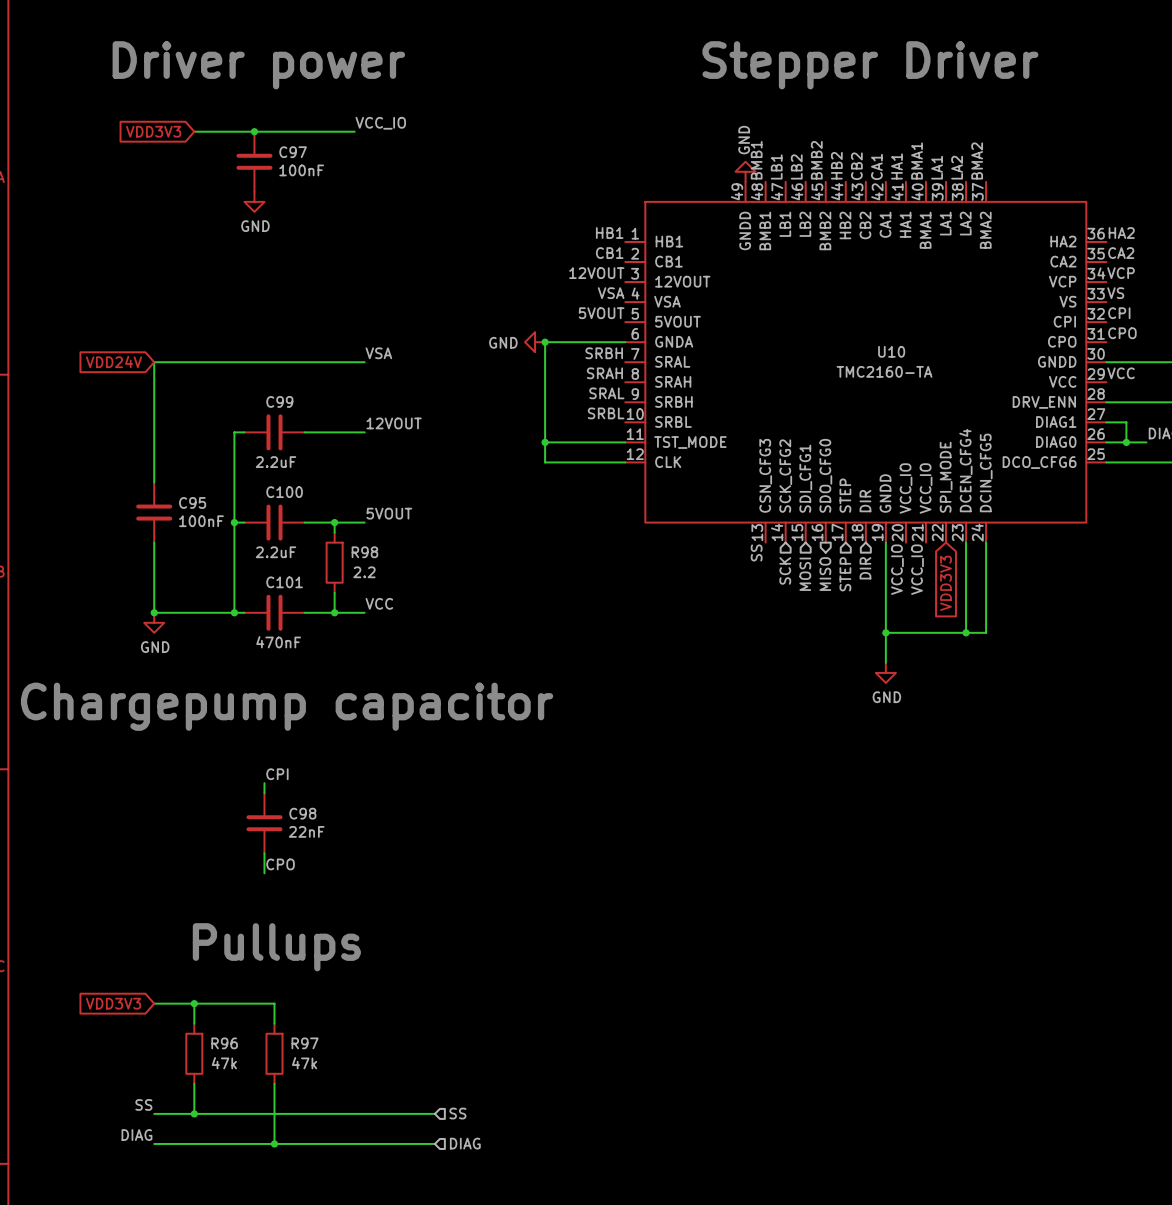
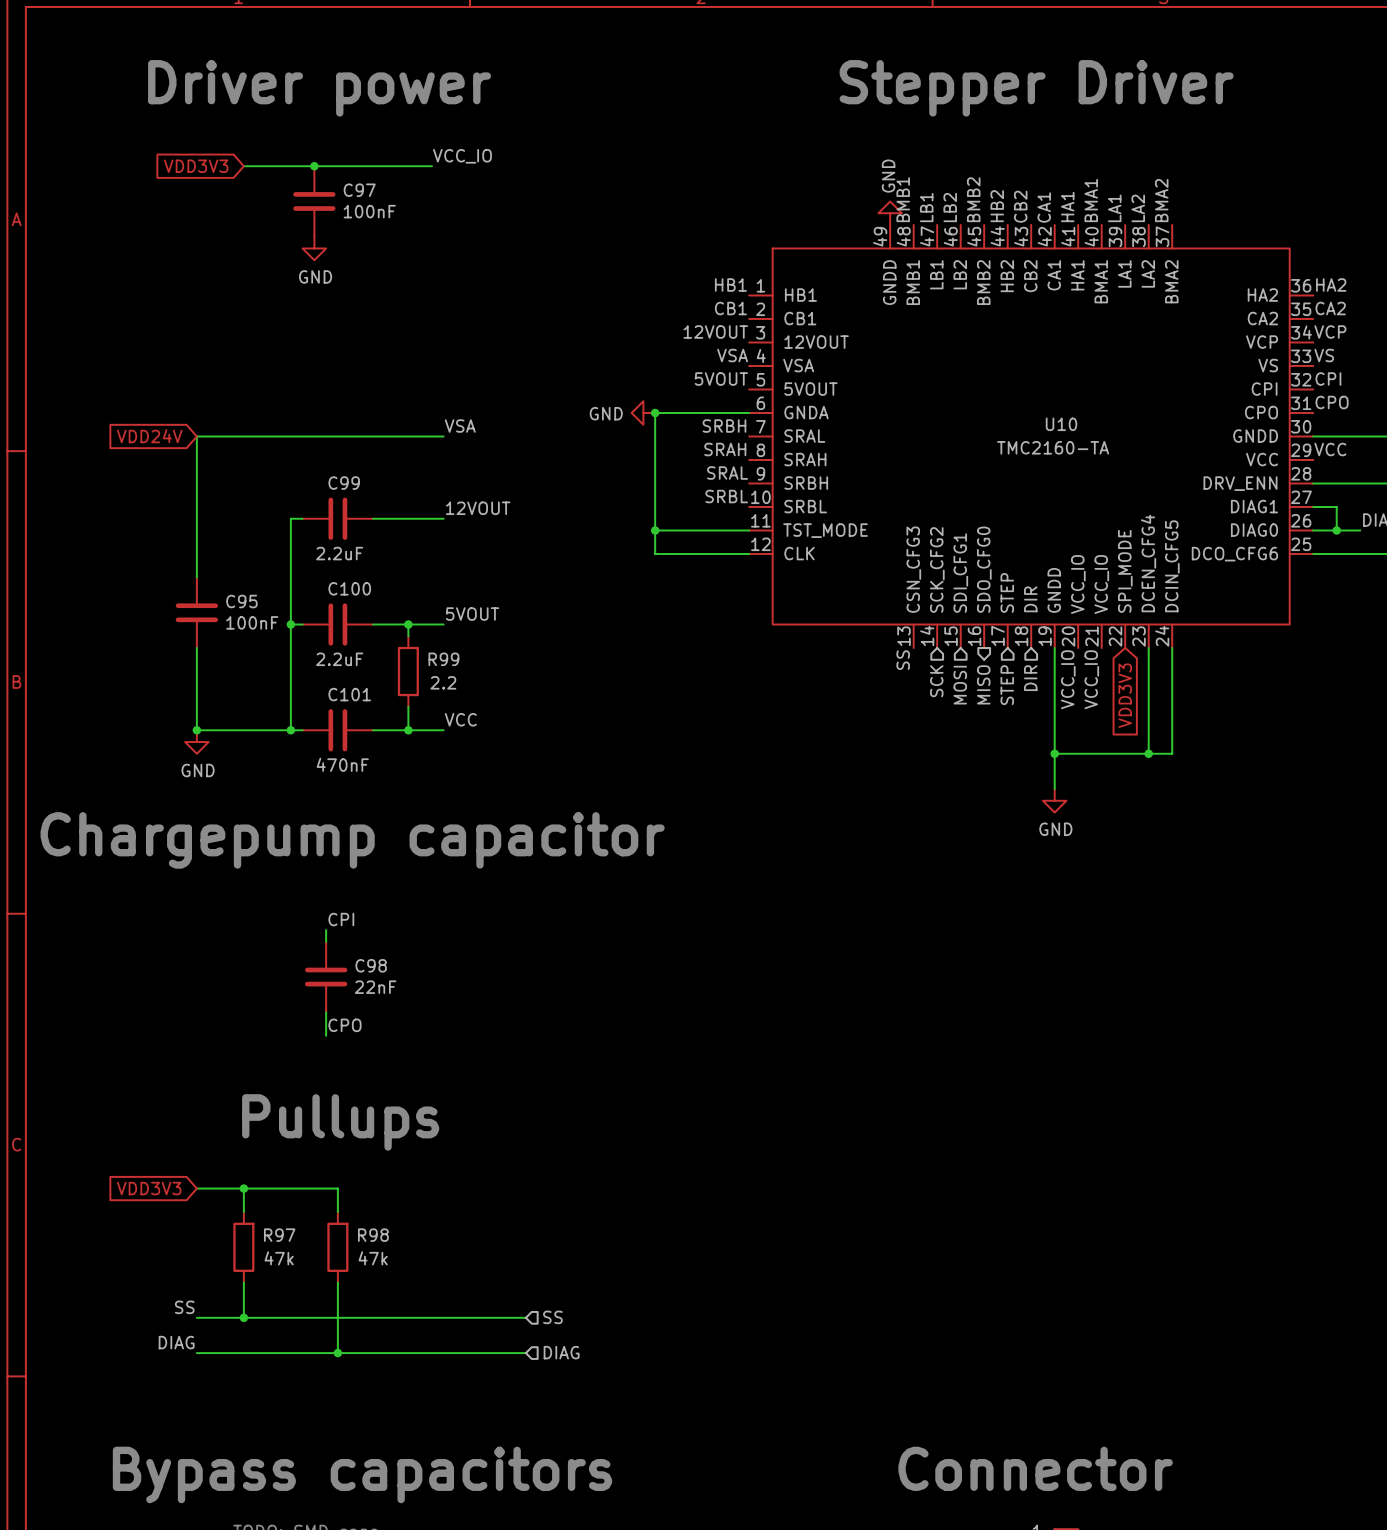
R98 name: R98 (364, 552) -> R99 (443, 659)
R96 name: R96 (224, 1043) -> R97 (279, 1235)
R97 name: R97 (305, 1043) -> R98 (373, 1235)

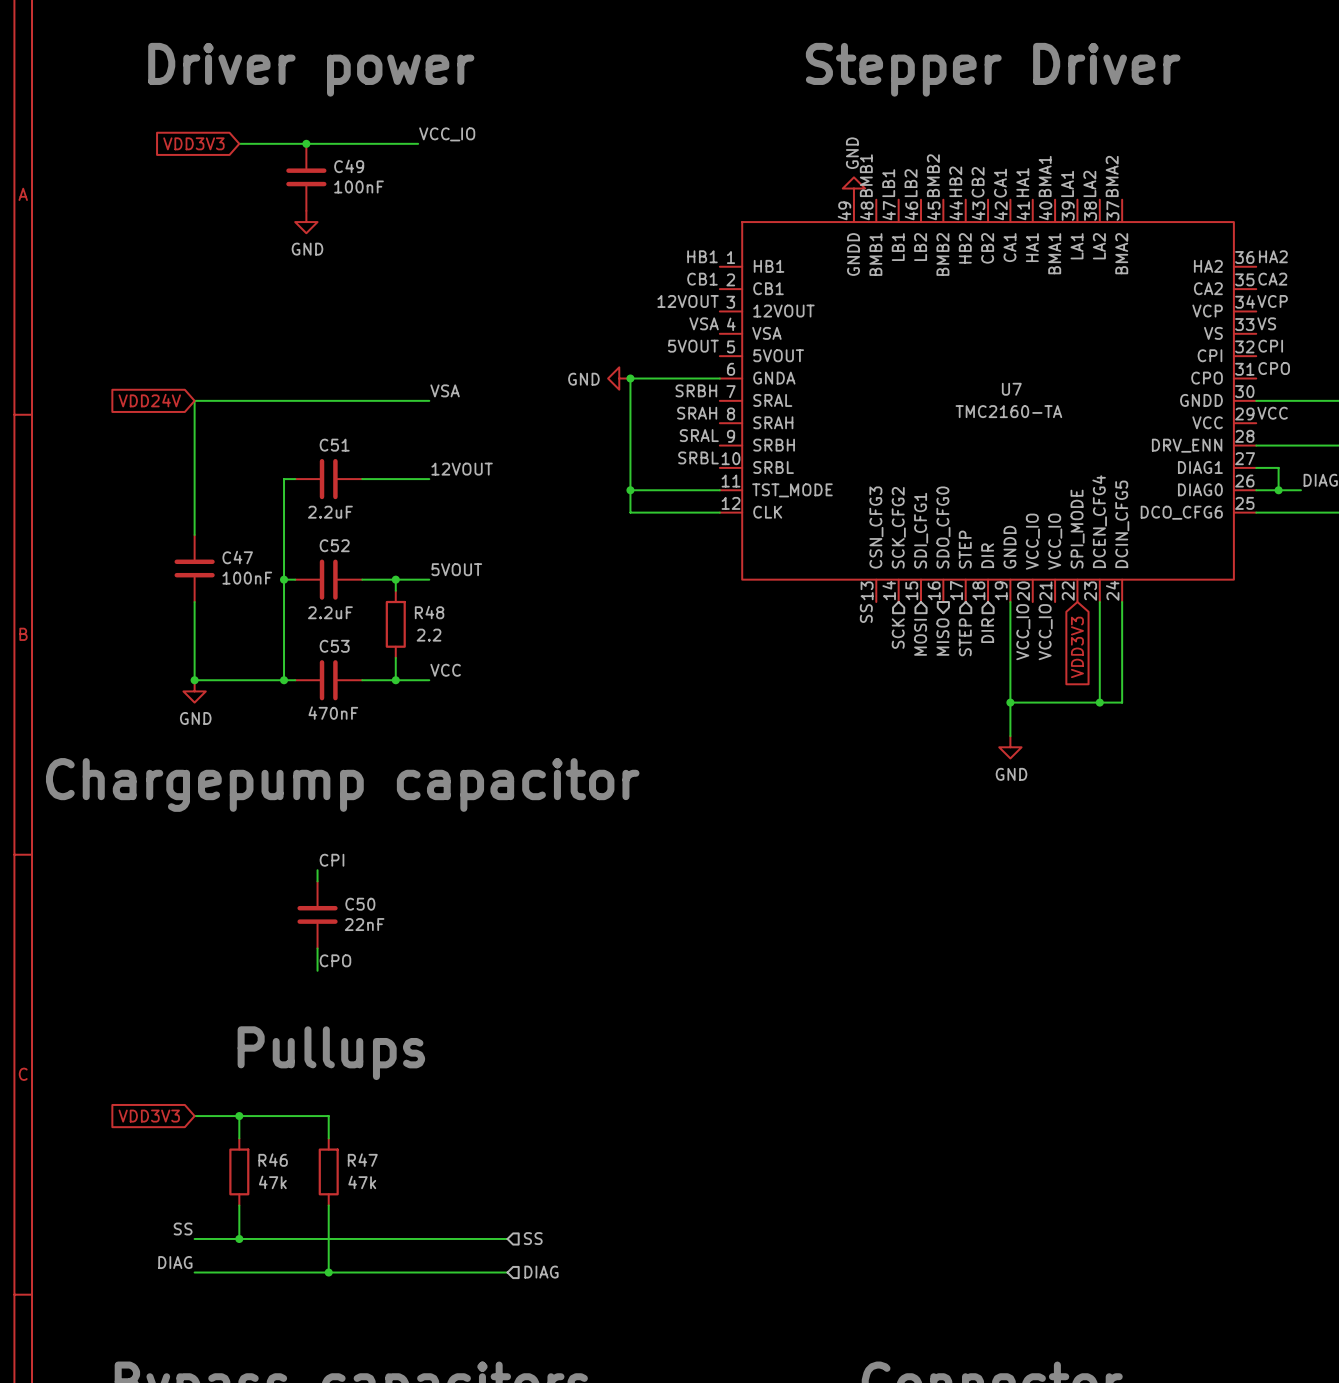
C97 name: C97 (359, 190) -> C49 (349, 166)
U10 name: U10 (1061, 424) -> U7 (1011, 389)
C99 name: C99 (344, 483) -> C51 (334, 445)
C100 name: C100 (349, 588) -> C52 (334, 545)
C95 name: C95 (241, 601) -> C47 (237, 557)
R99 name: R99 (443, 659) -> R48 (429, 612)
C101 name: C101 (349, 694) -> C53 (334, 646)
C98 name: C98 (371, 965) -> C50 (360, 904)
R97 name: R97 (279, 1235) -> R46 (273, 1160)
R98 name: R98 (373, 1235) -> R47 (362, 1160)

